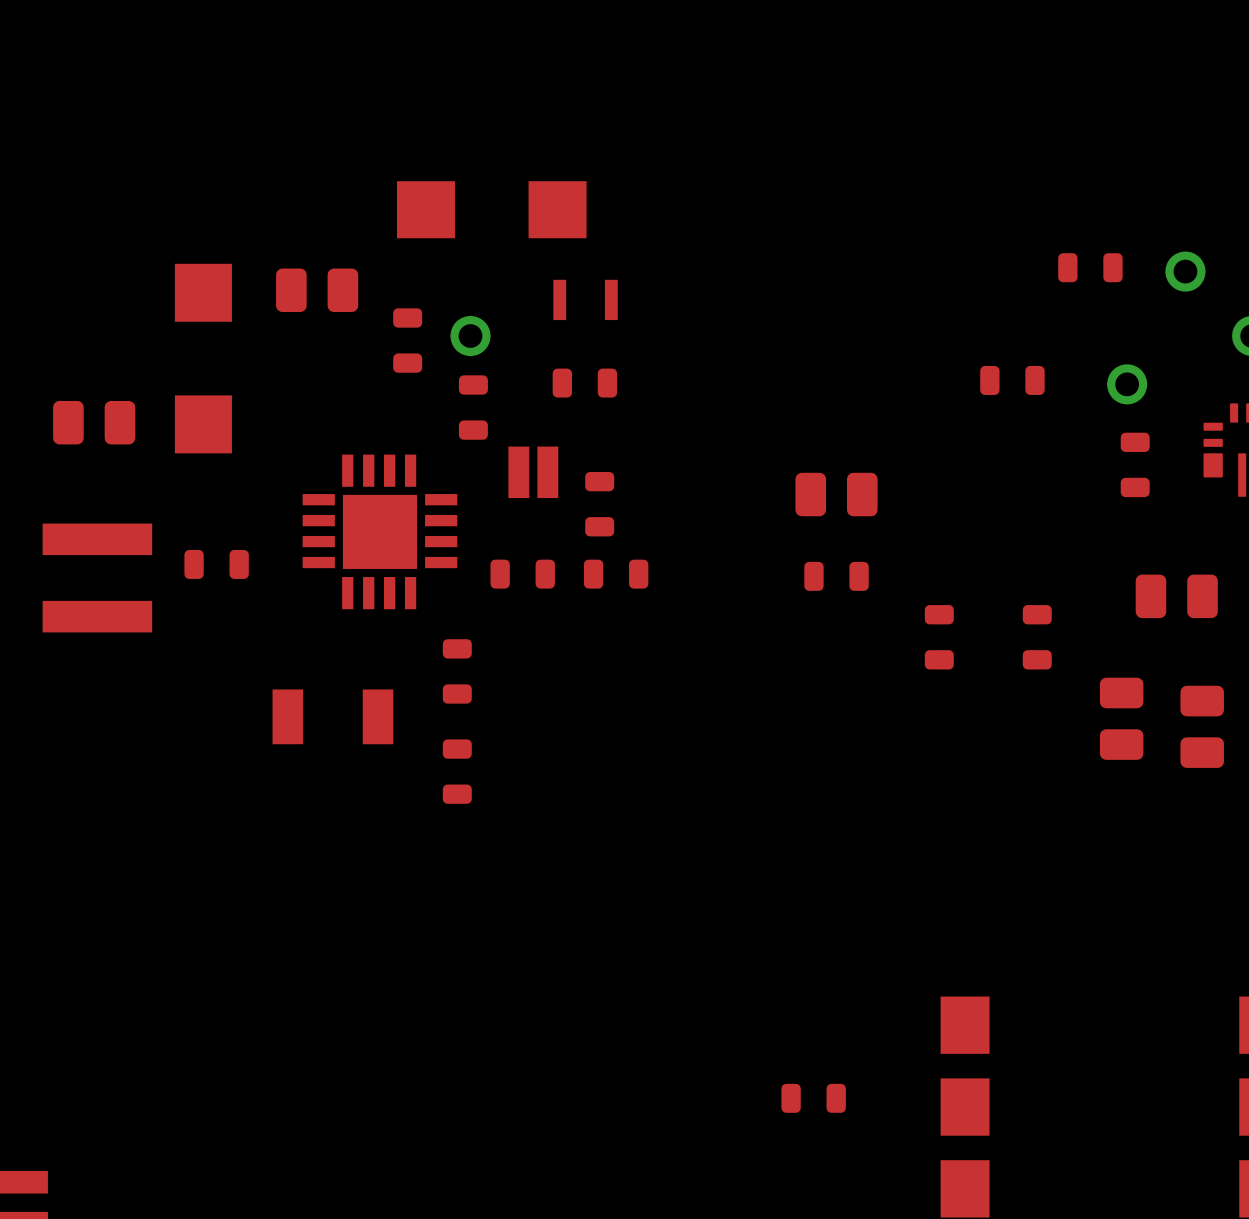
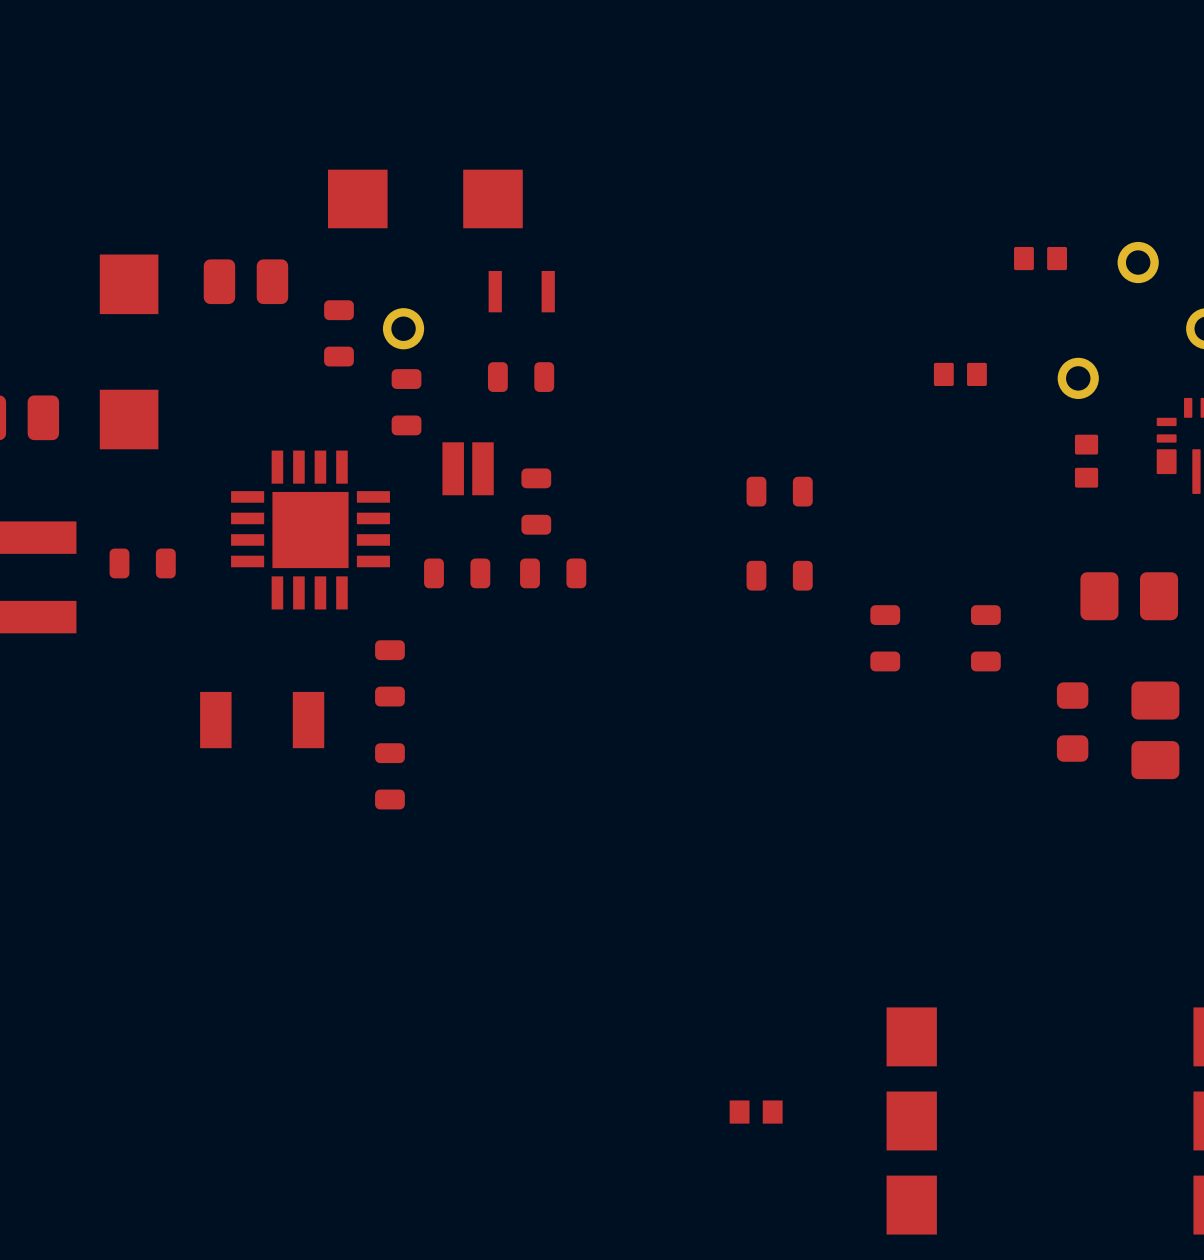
part footprint: [1058, 253, 1123, 283] -> [1014, 246, 1068, 271]
part footprint: [980, 365, 1045, 395] -> [933, 362, 987, 387]
part footprint: [1120, 432, 1150, 498] -> [1074, 434, 1099, 488]
part footprint: [795, 472, 878, 517] -> [746, 476, 813, 507]
part footprint: [1135, 574, 1218, 619] -> [1080, 572, 1179, 621]
part footprint: [1099, 677, 1144, 760] -> [1056, 682, 1089, 762]
part footprint: [1180, 685, 1224, 768] -> [1131, 681, 1180, 780]
part footprint: [781, 1083, 846, 1113] -> [729, 1100, 783, 1124]

